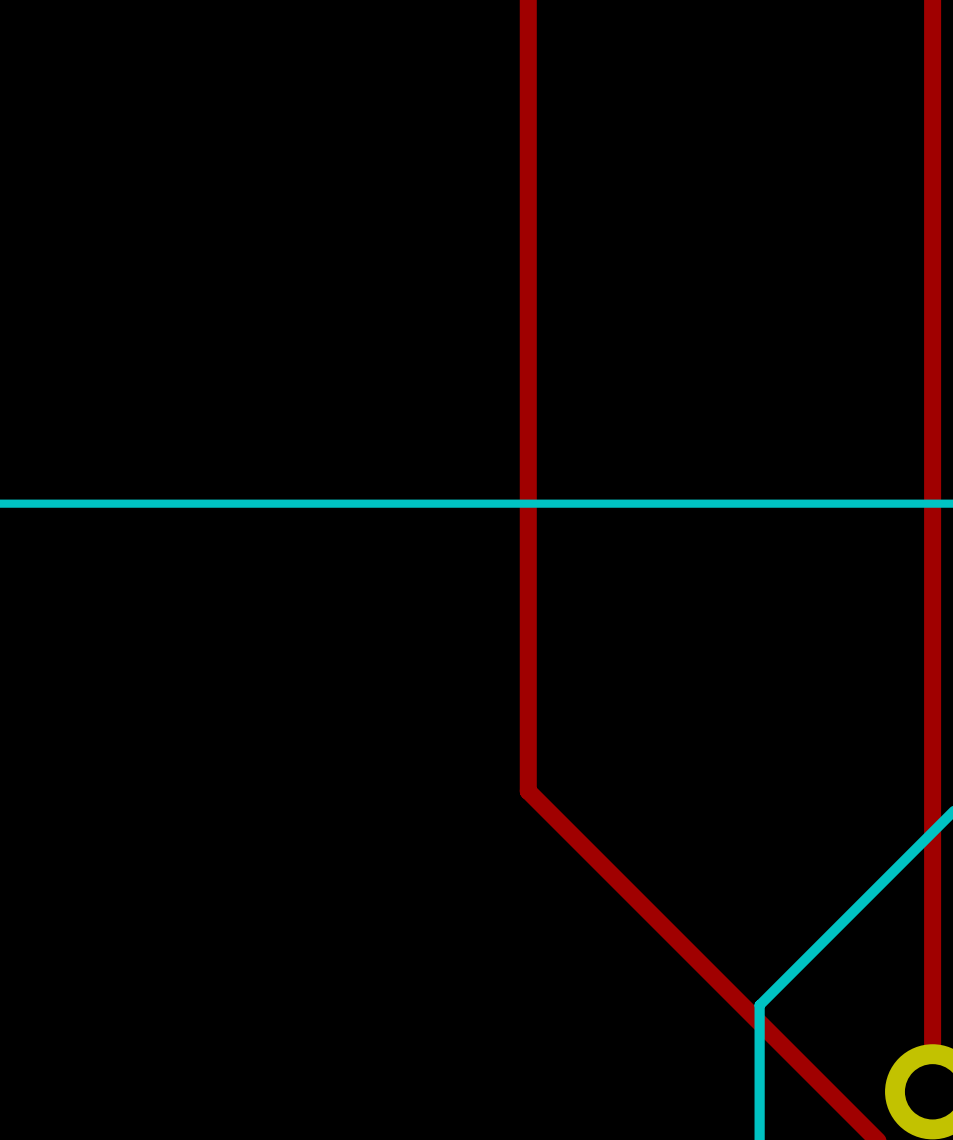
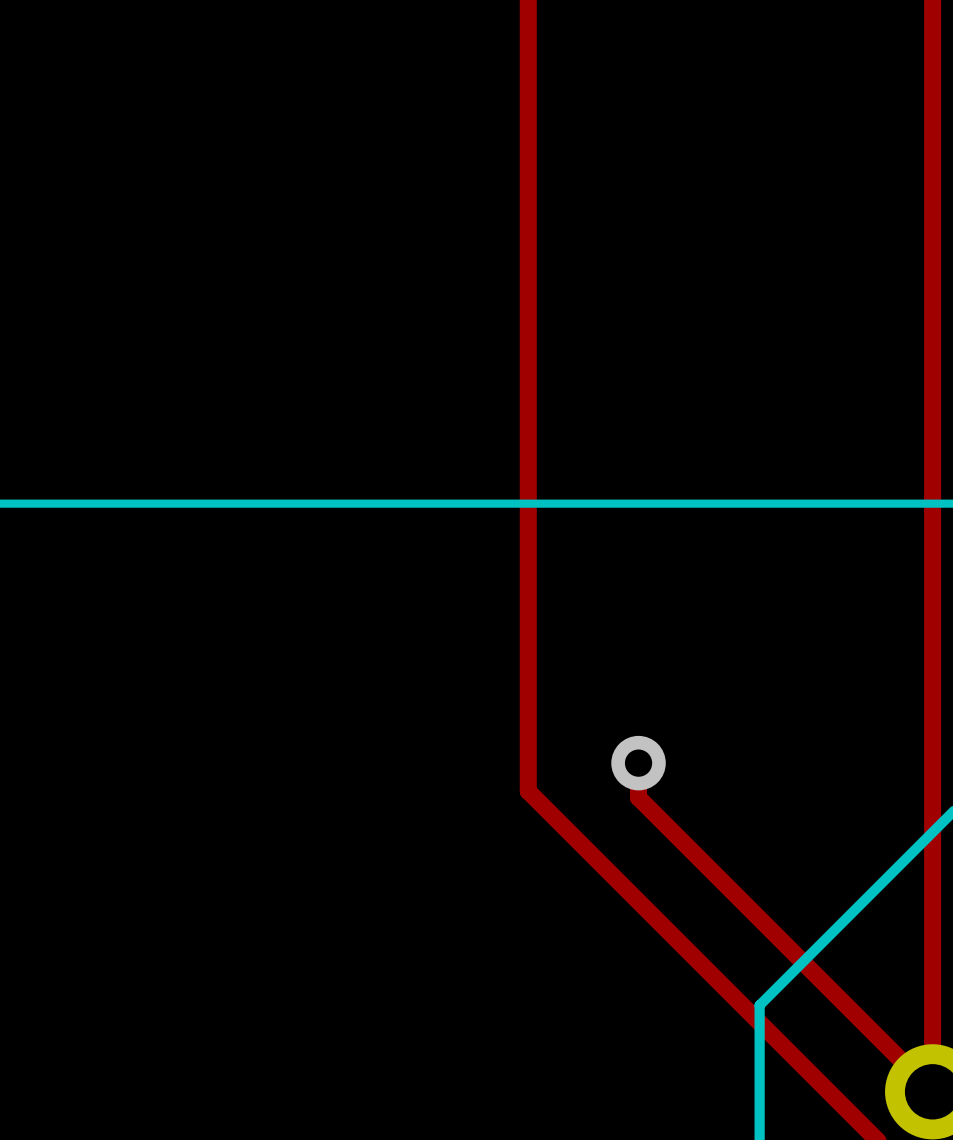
track: none -> (638, 763) (638, 797) (932, 1091)
via: none -> (638, 763)

